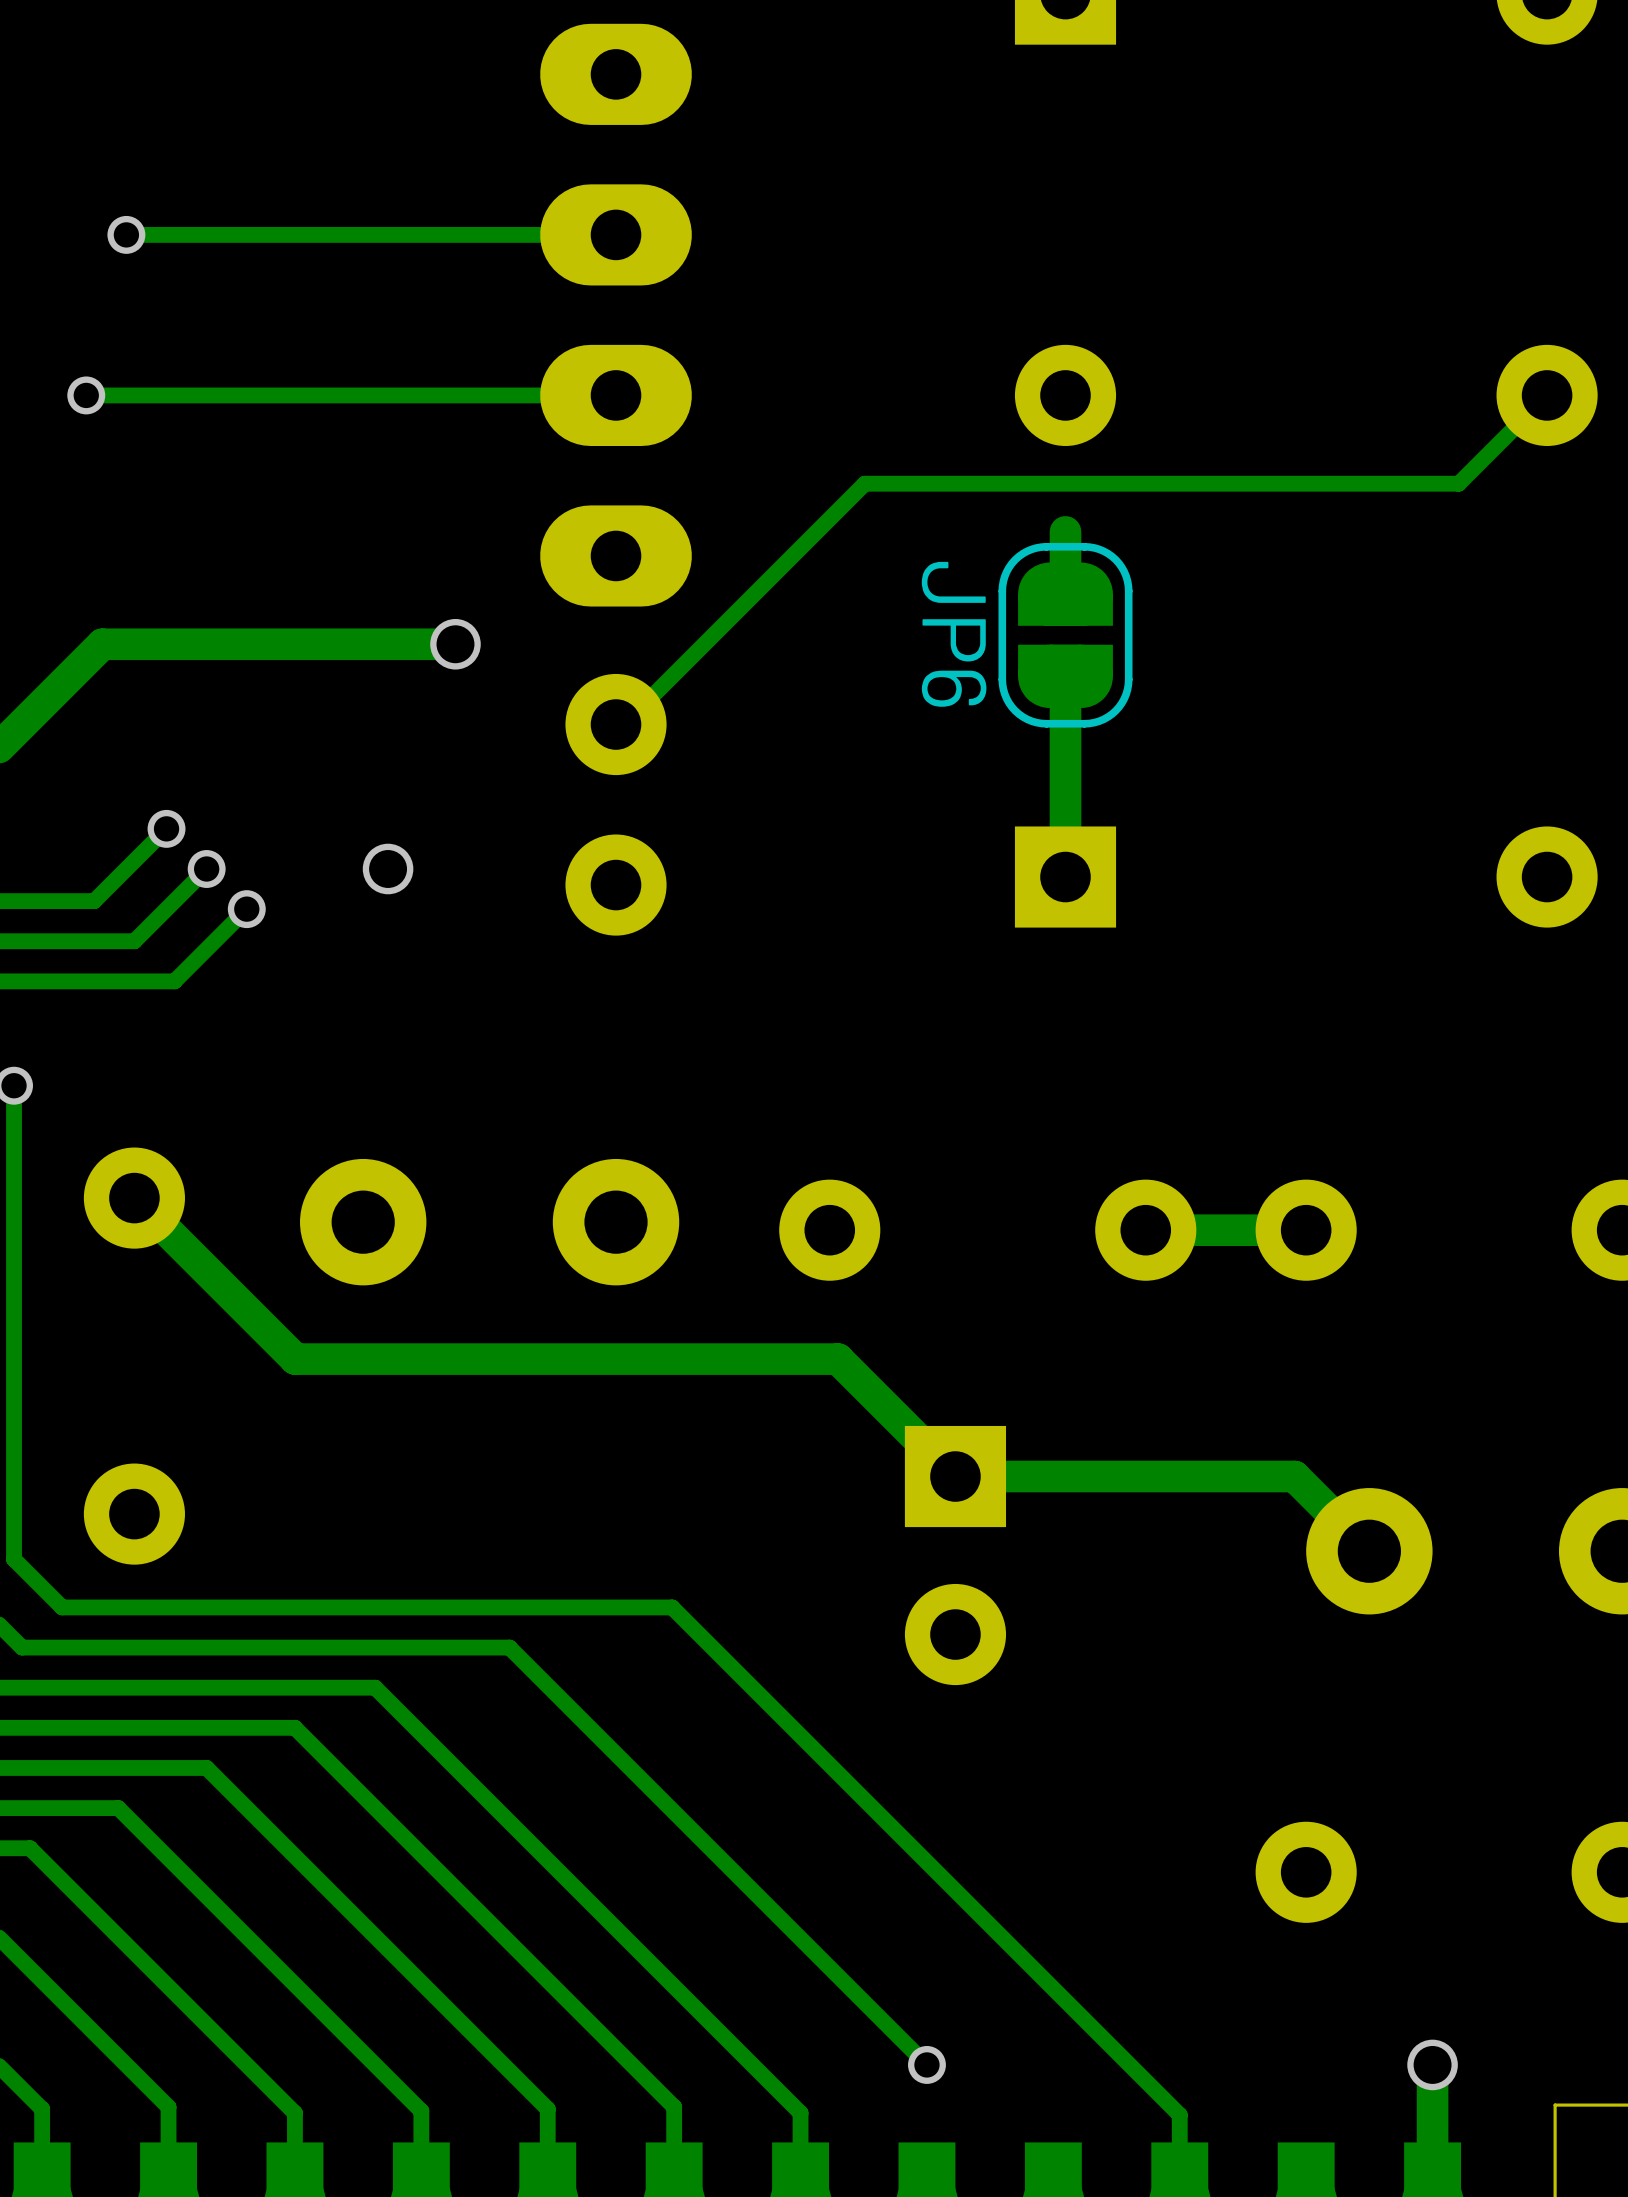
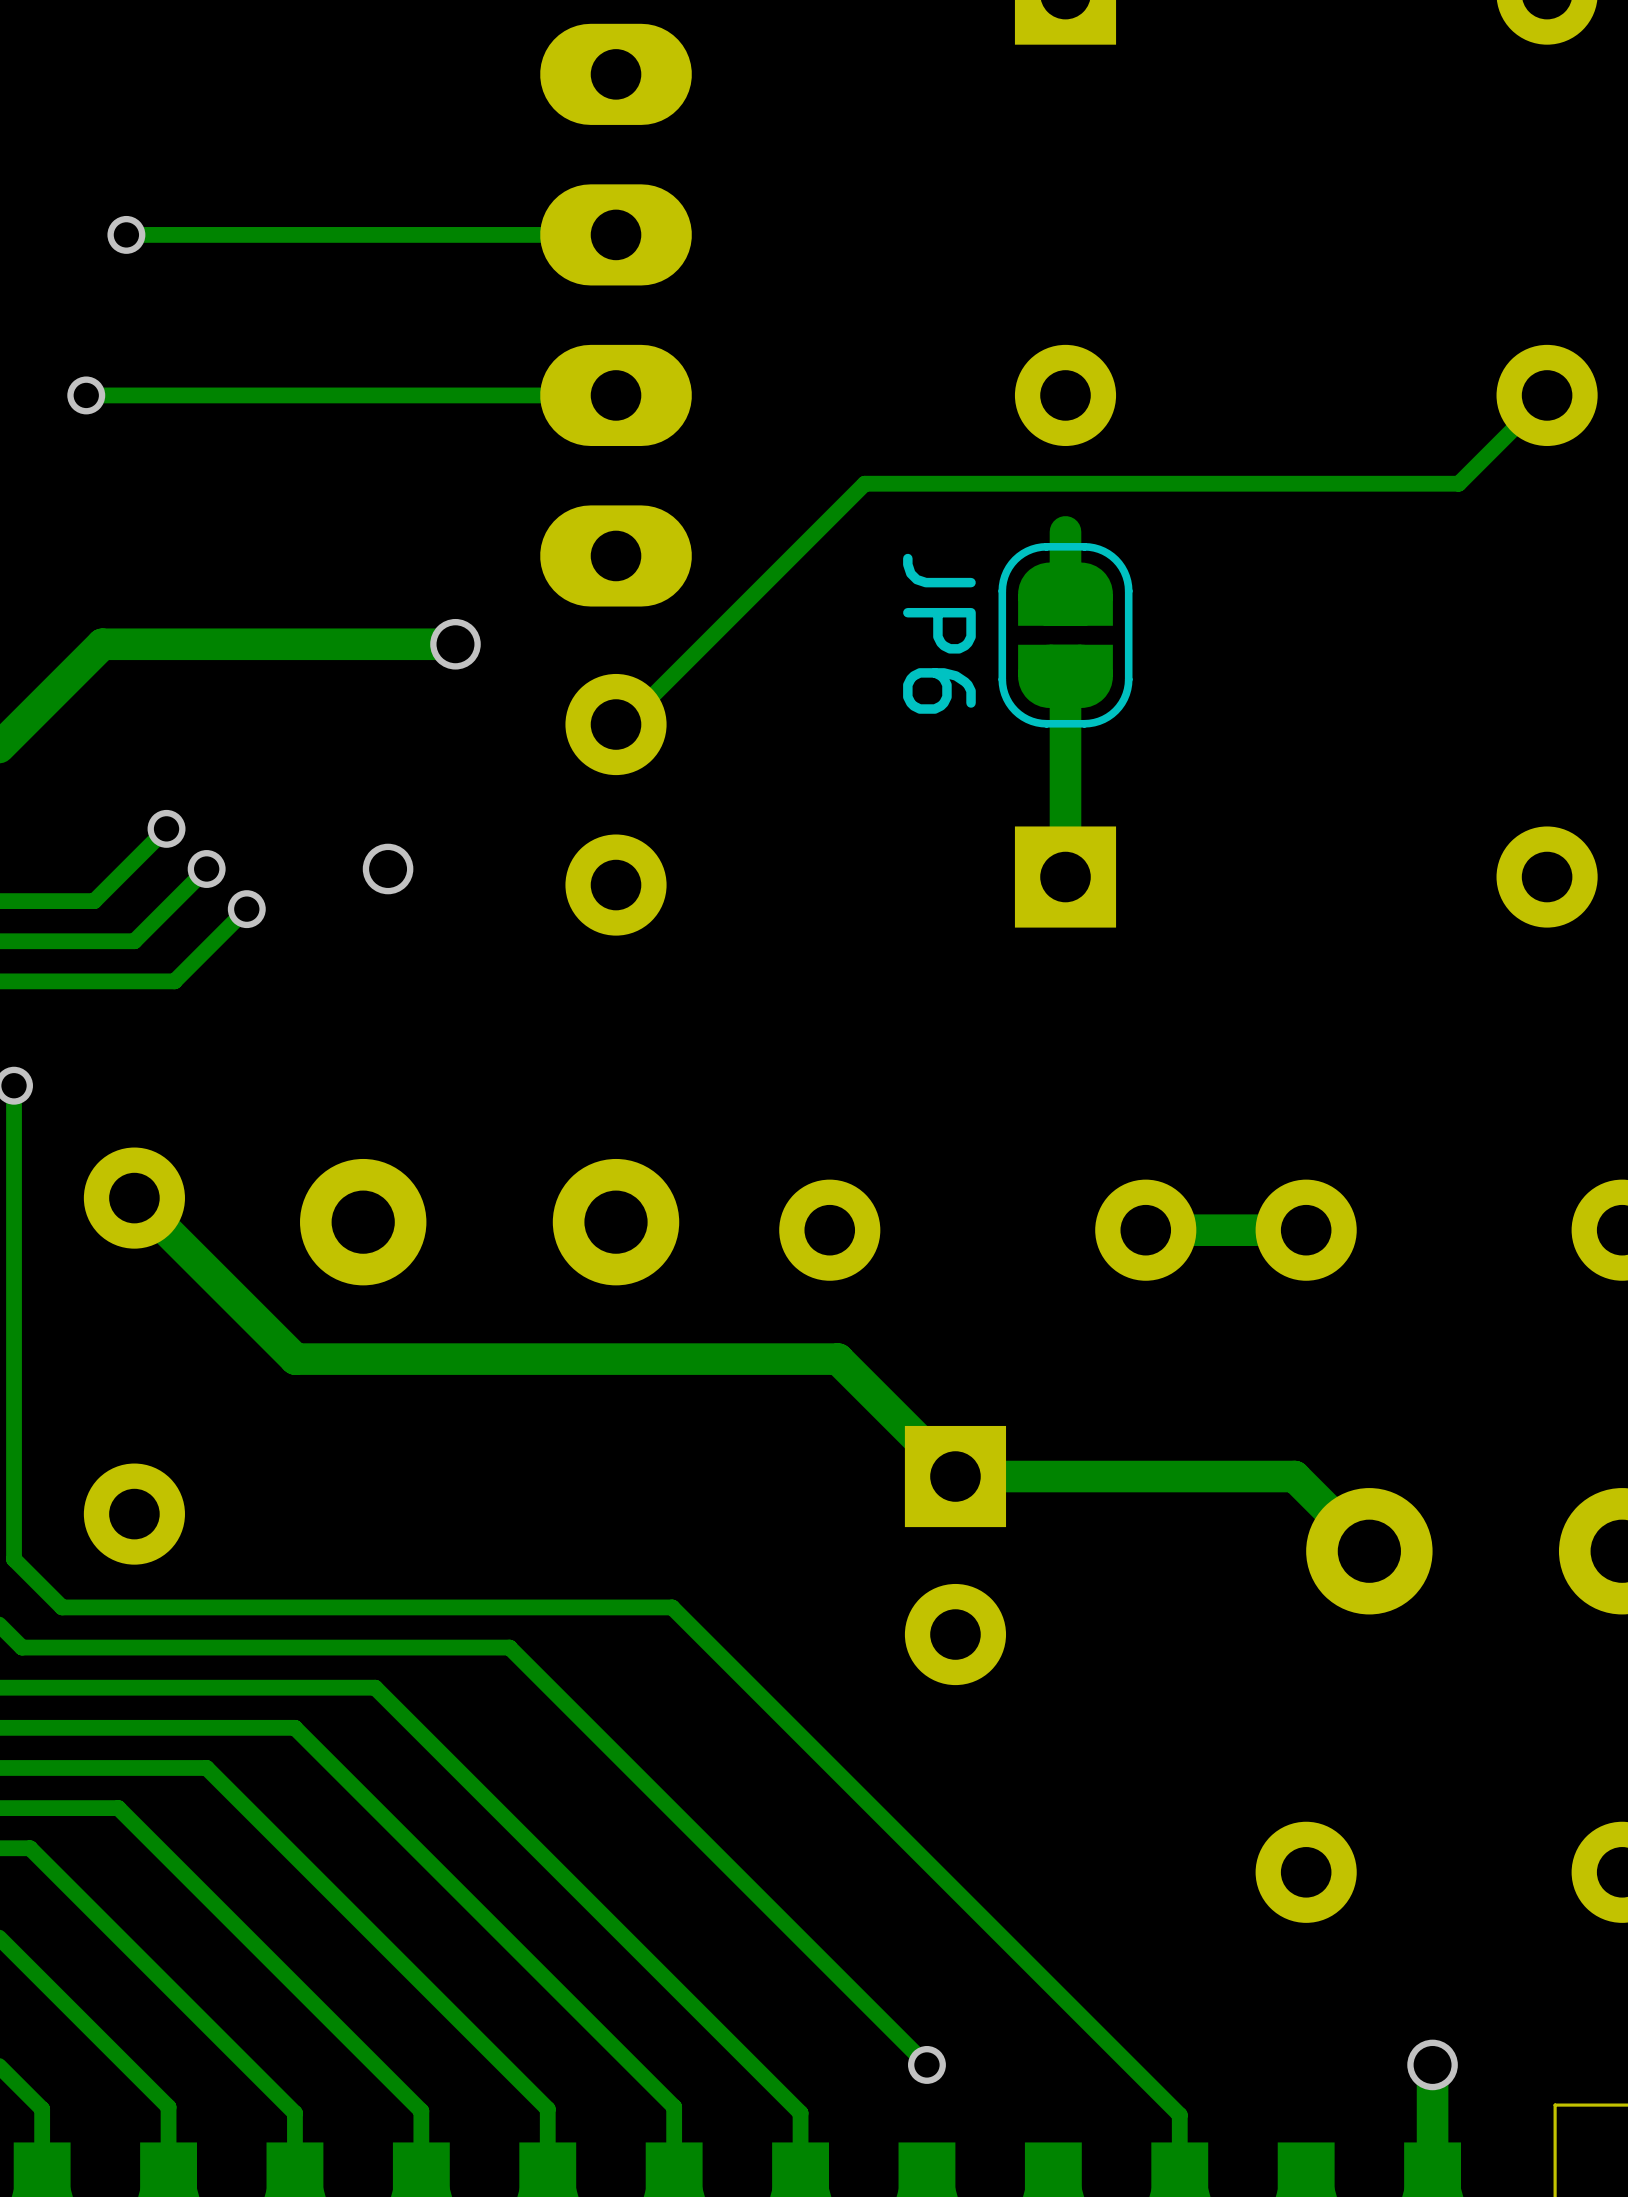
JP6 name position: JP6 (954, 634) -> JP6 (939, 633)

